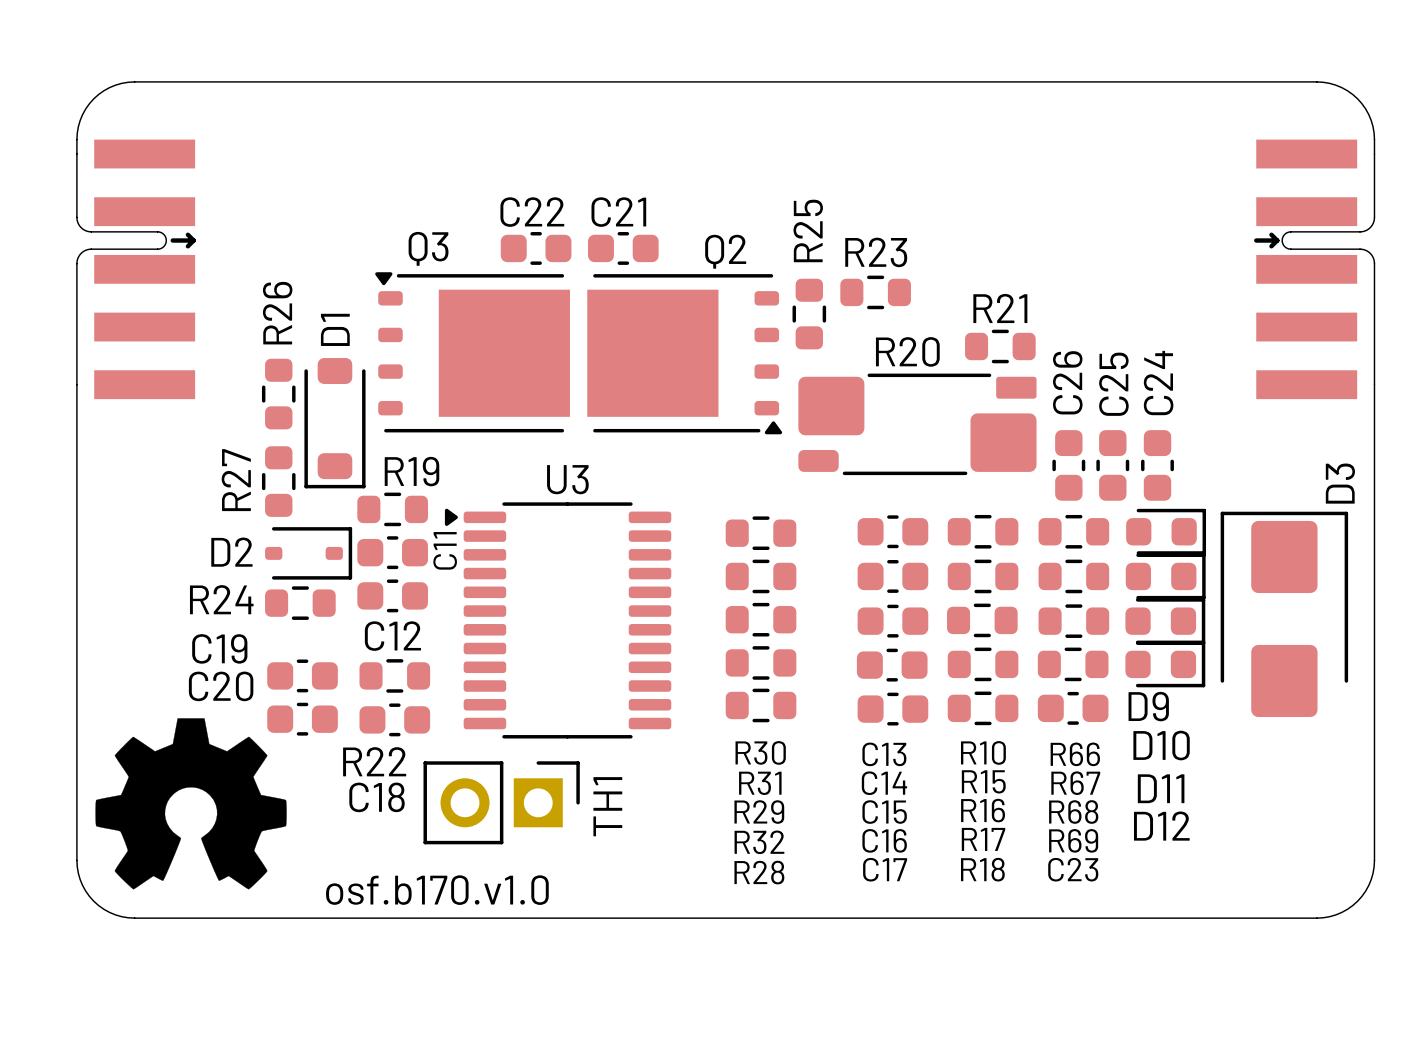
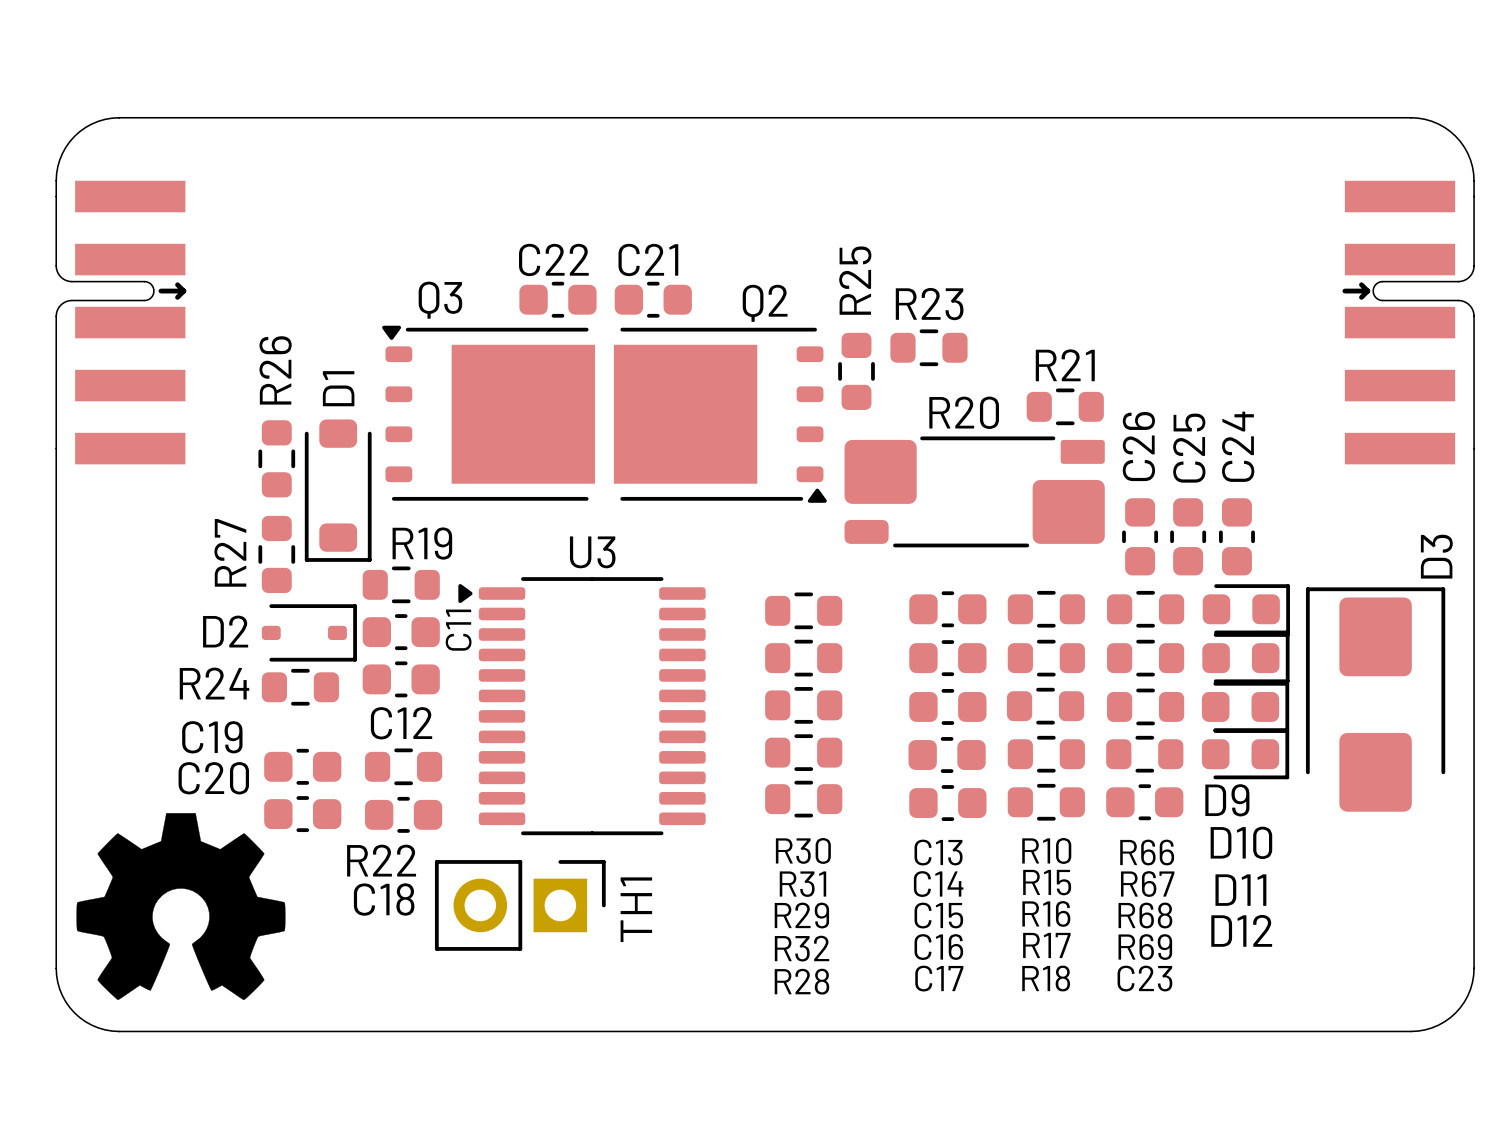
text: osf.b170.v1.0 (437, 890) -> none

